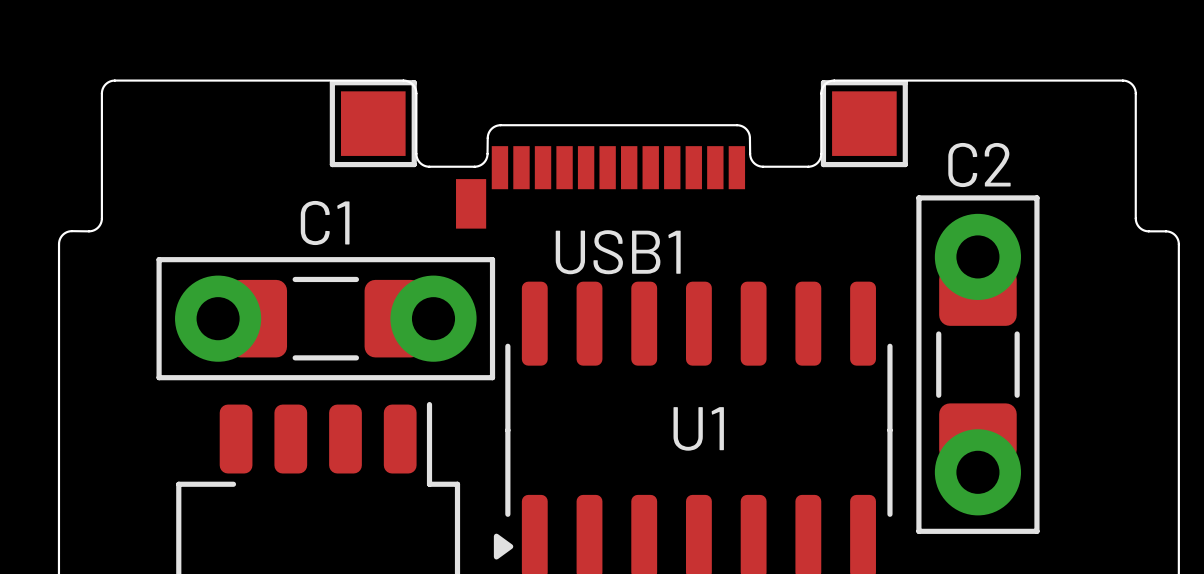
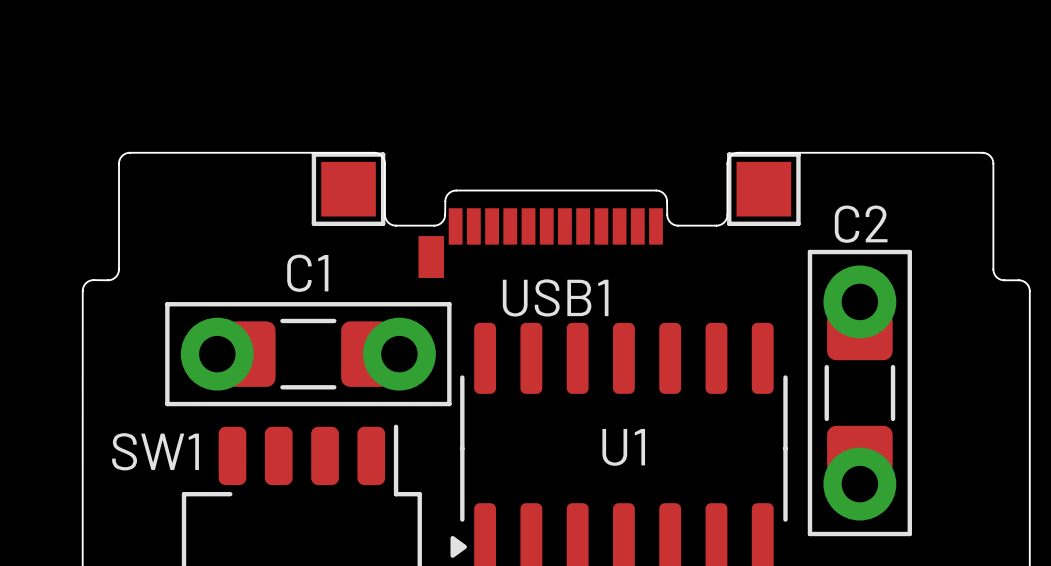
text: none -> SW1 (155, 451)

